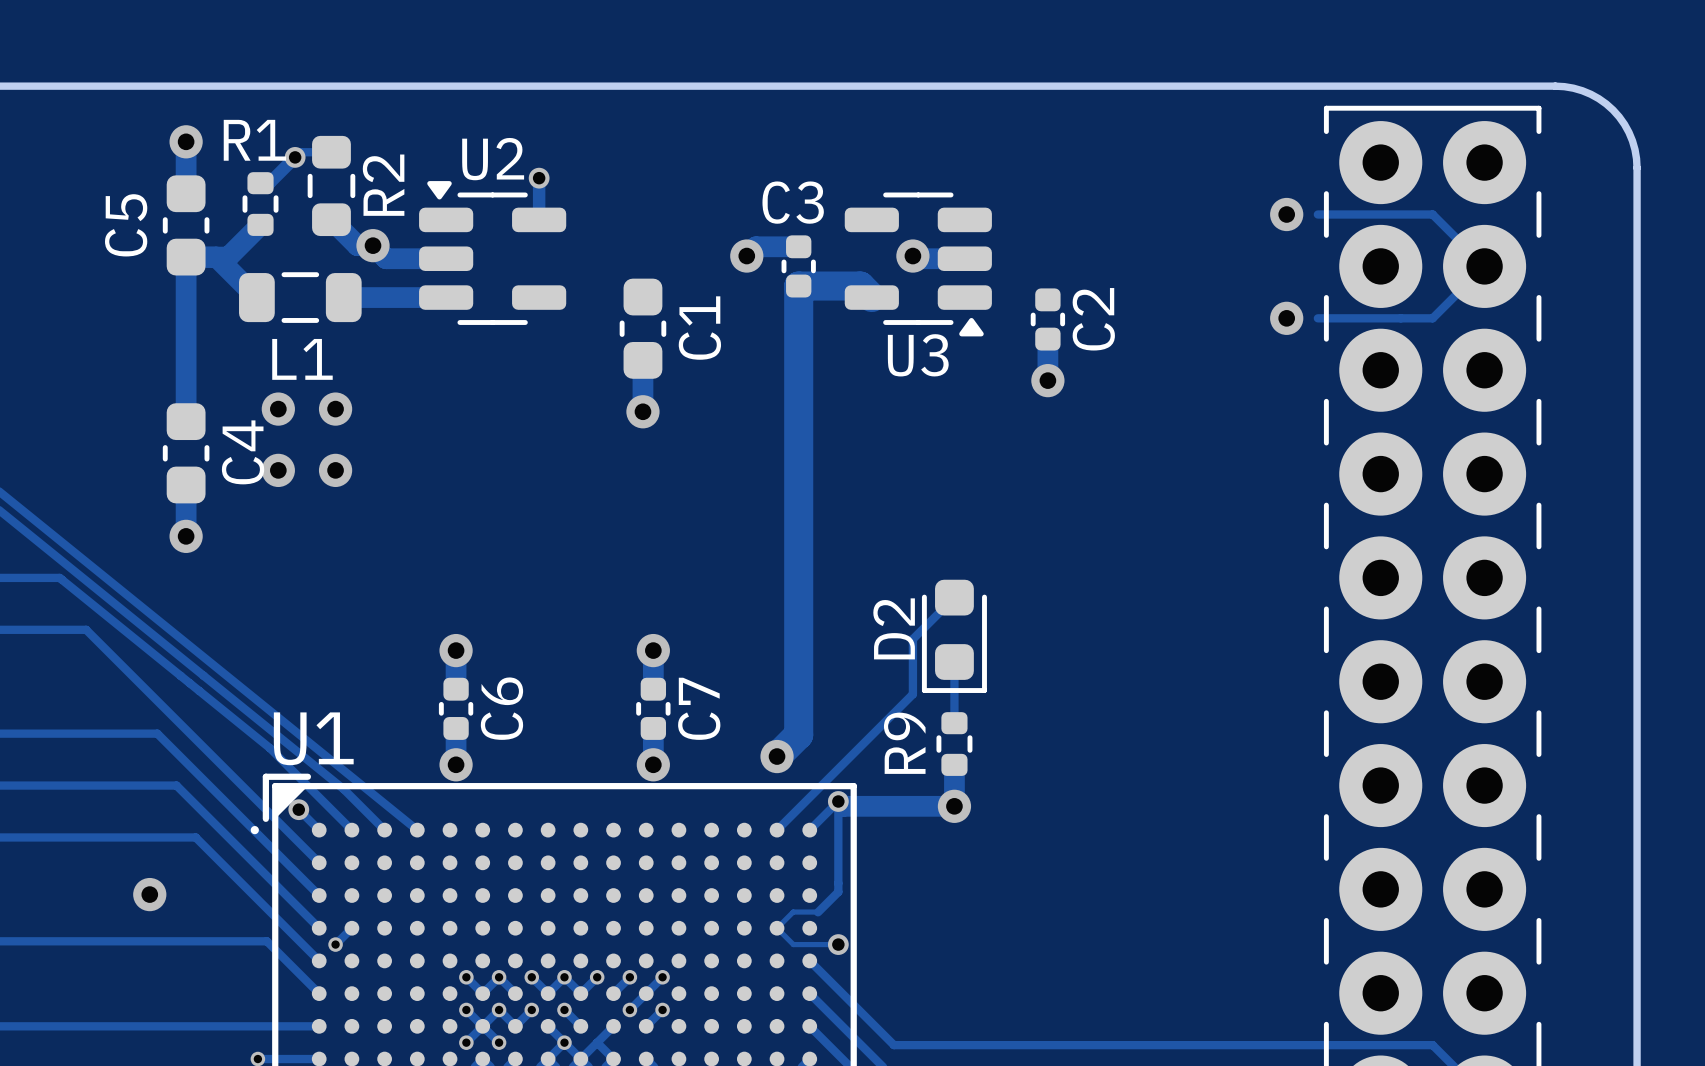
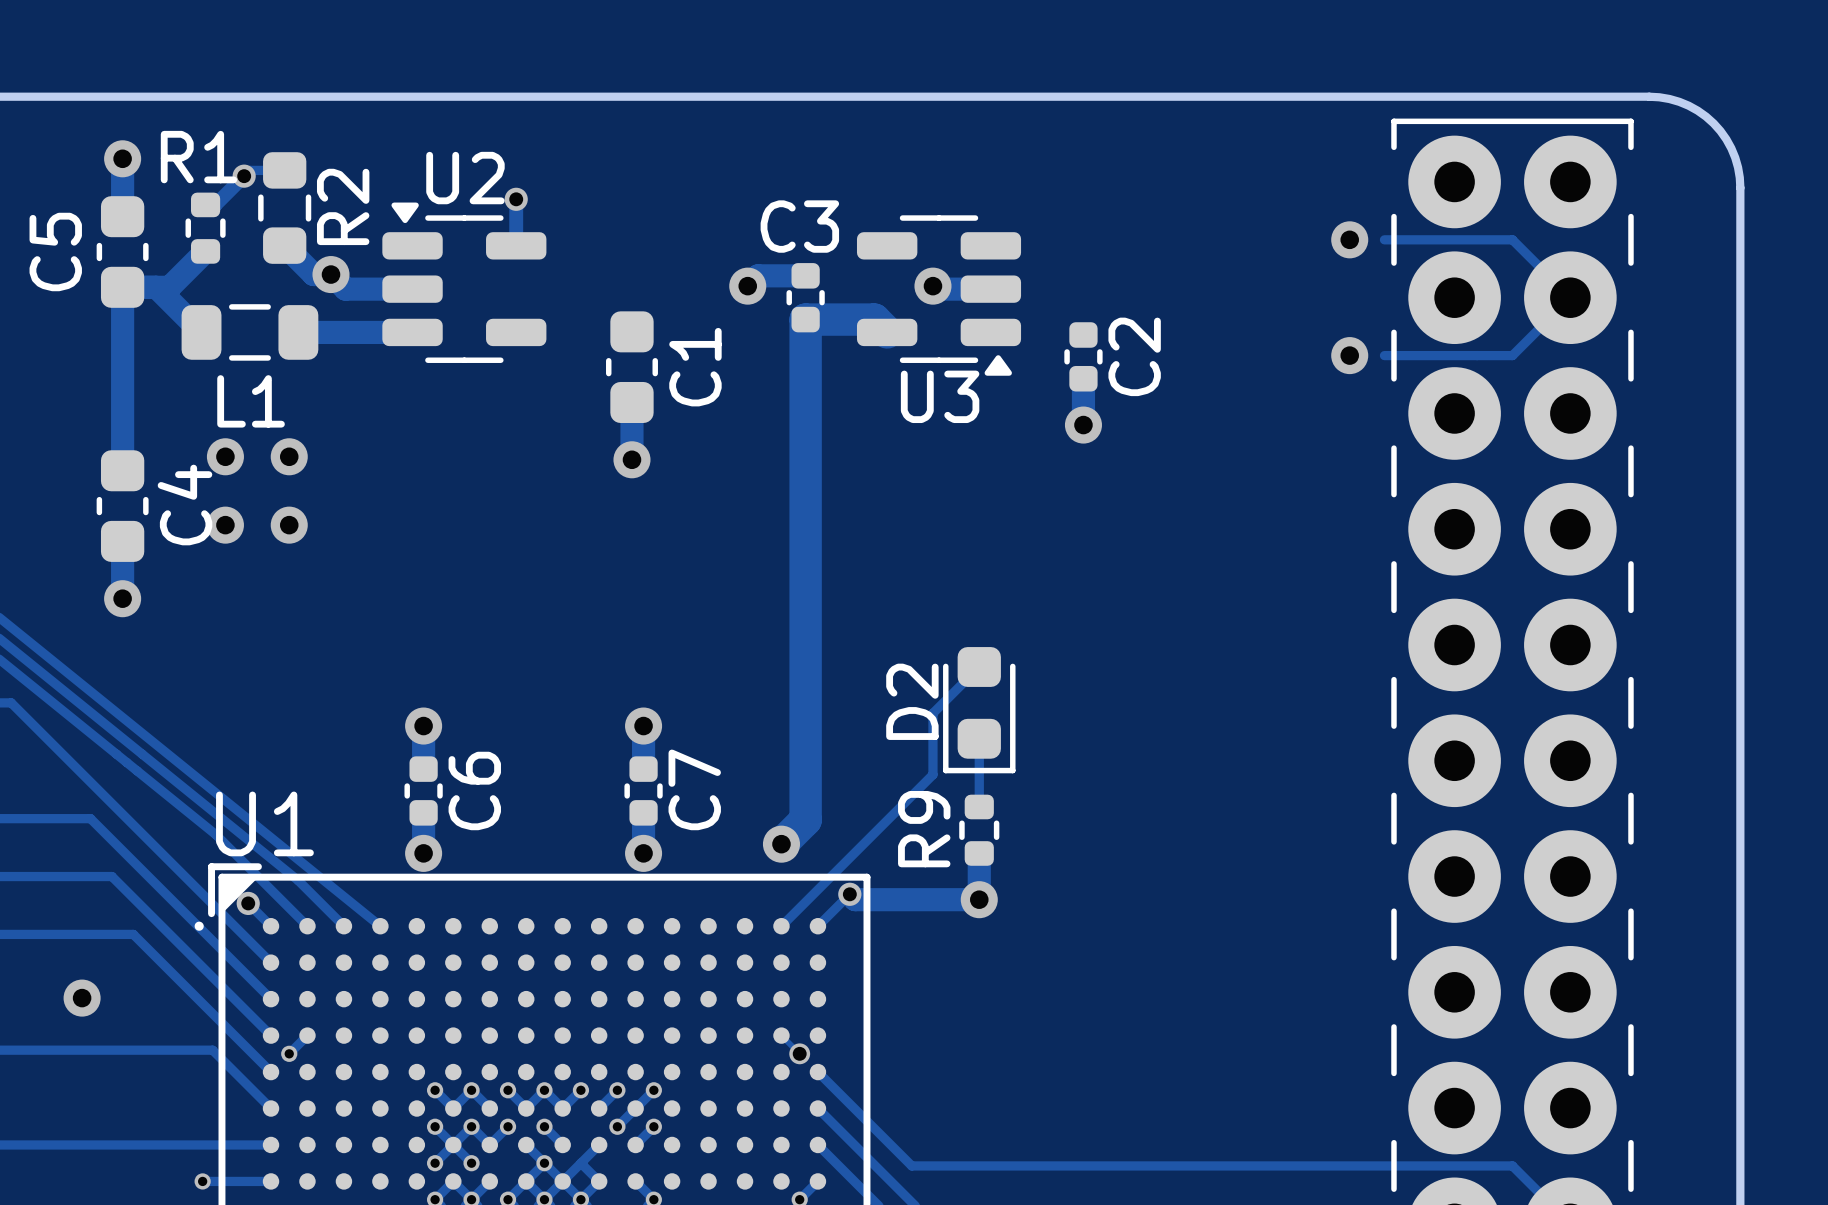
track: (838, 801) (838, 891) (818, 912) -> none
track: (817, 912) (793, 912) (777, 928) -> none
track: (793, 944) (838, 944) -> none
via: none -> (799, 1053)
via: (838, 944) -> none

